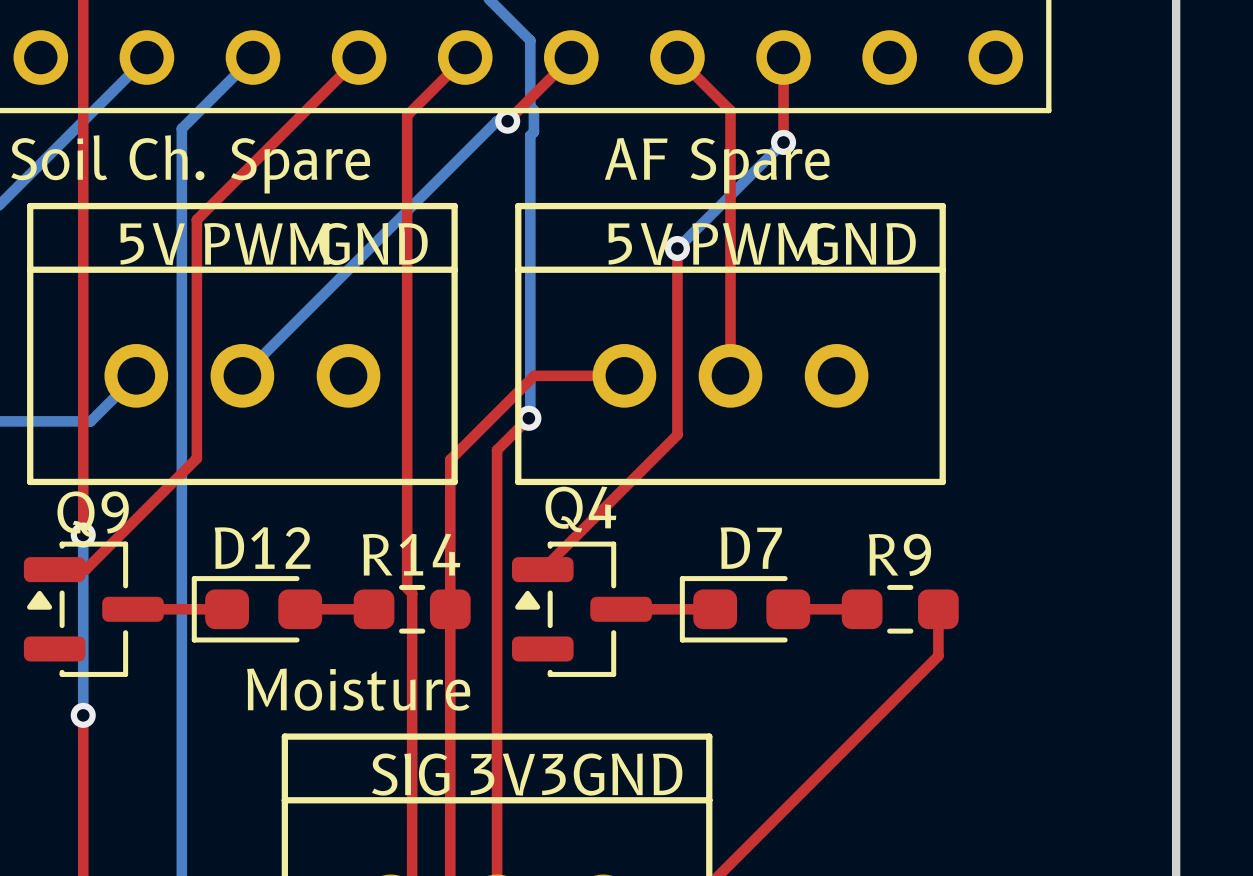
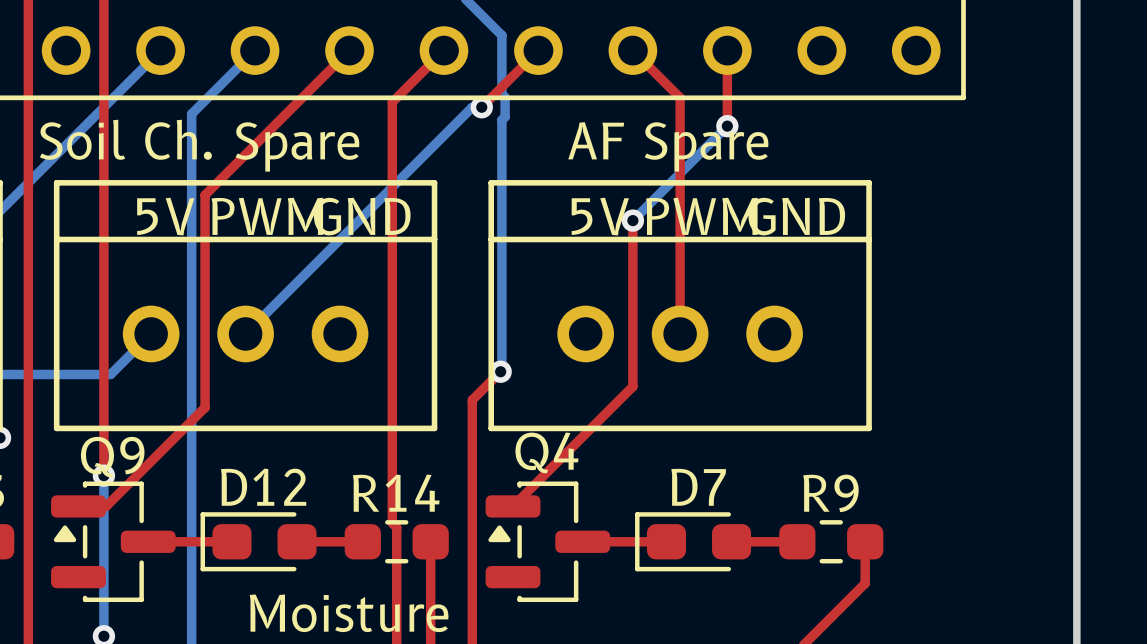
top track: (624, 375) (534, 375) (450, 459) (450, 609) -> none

